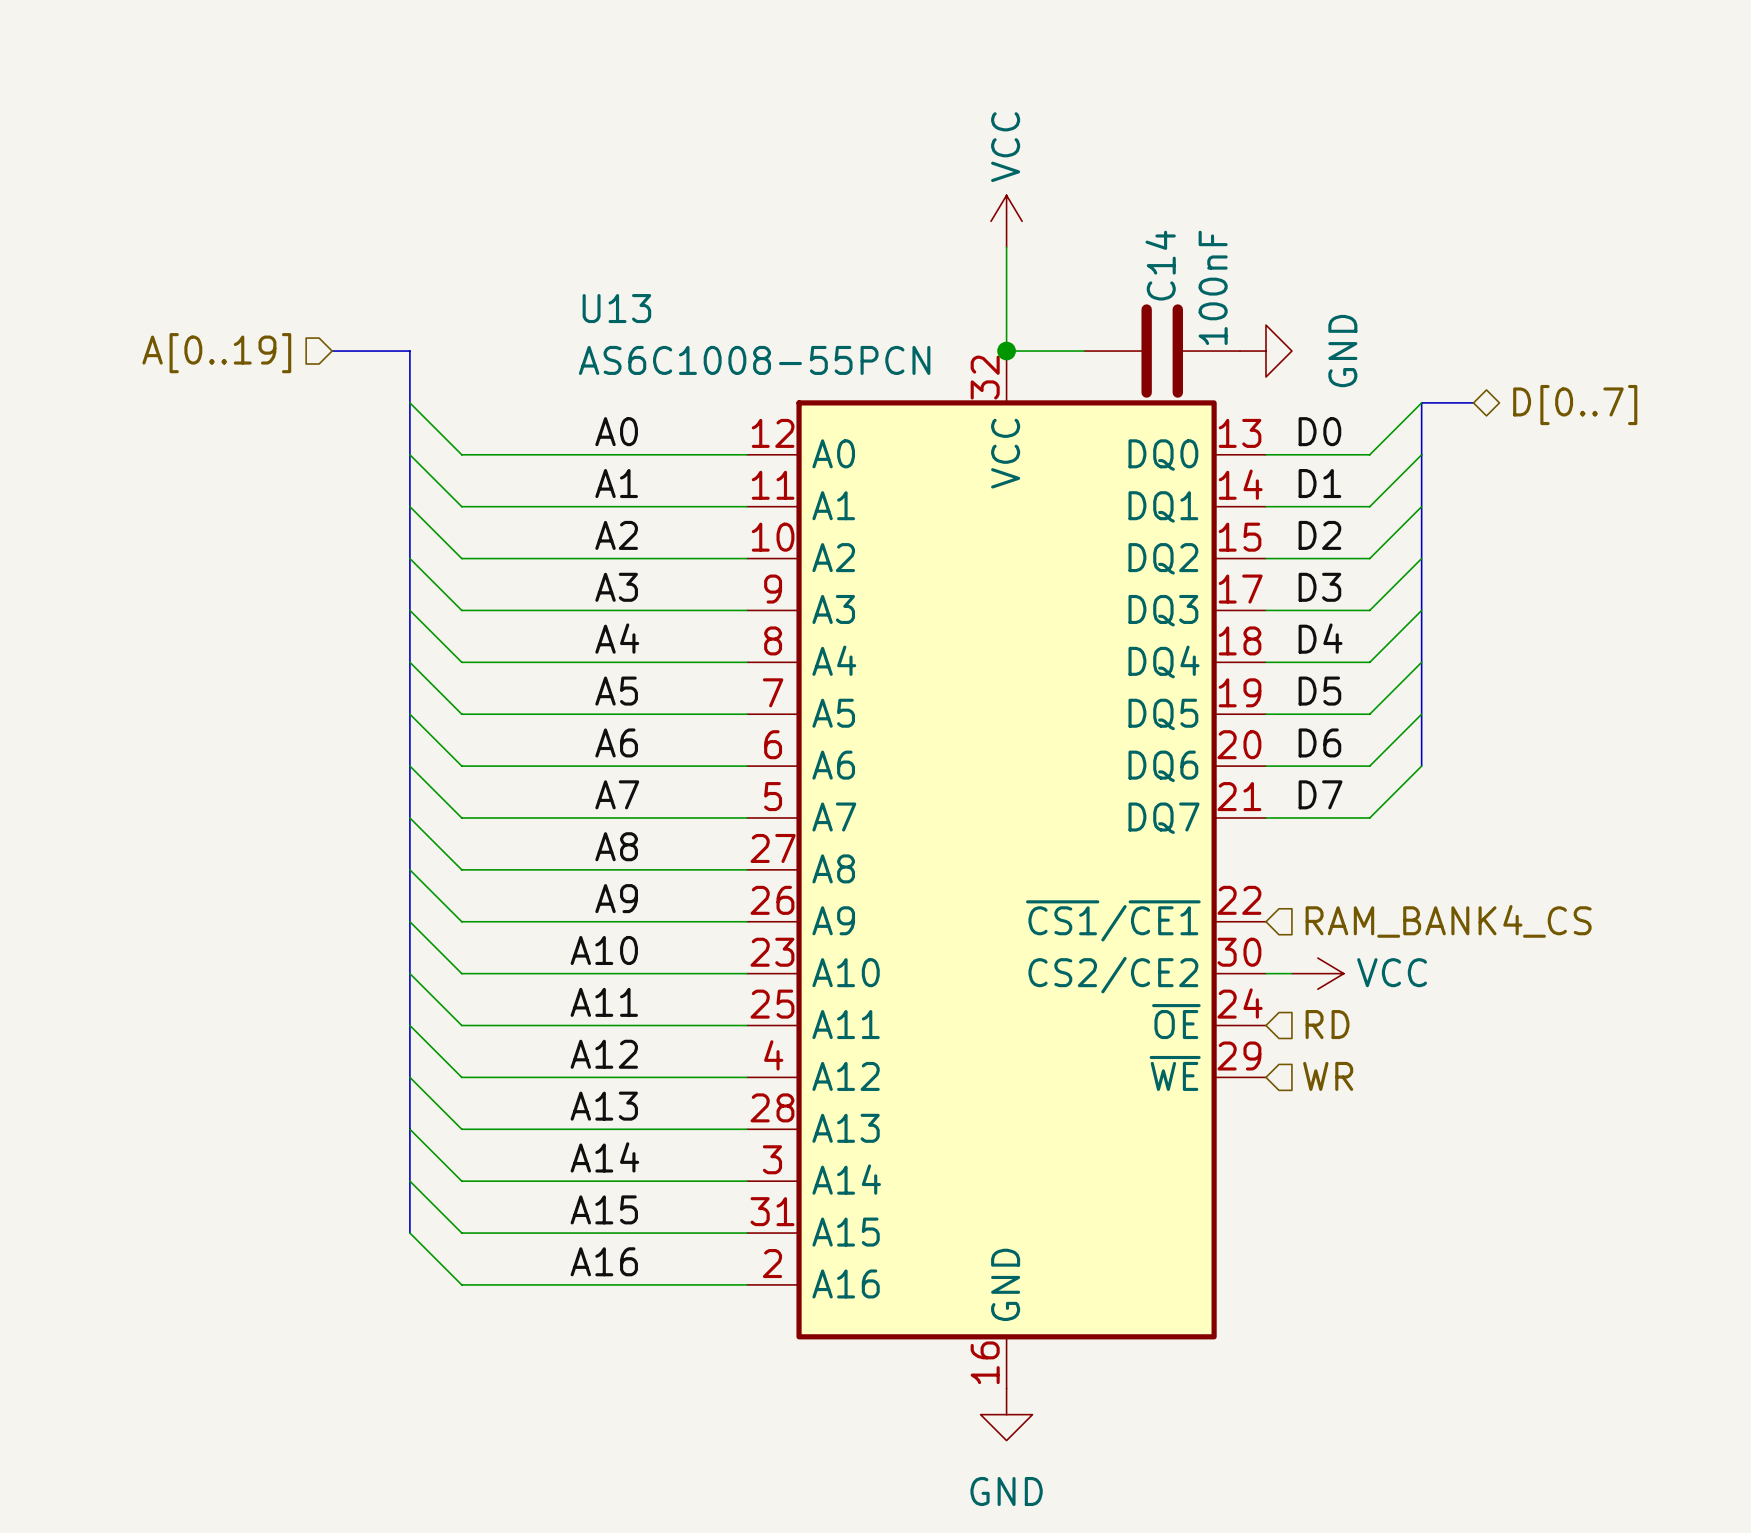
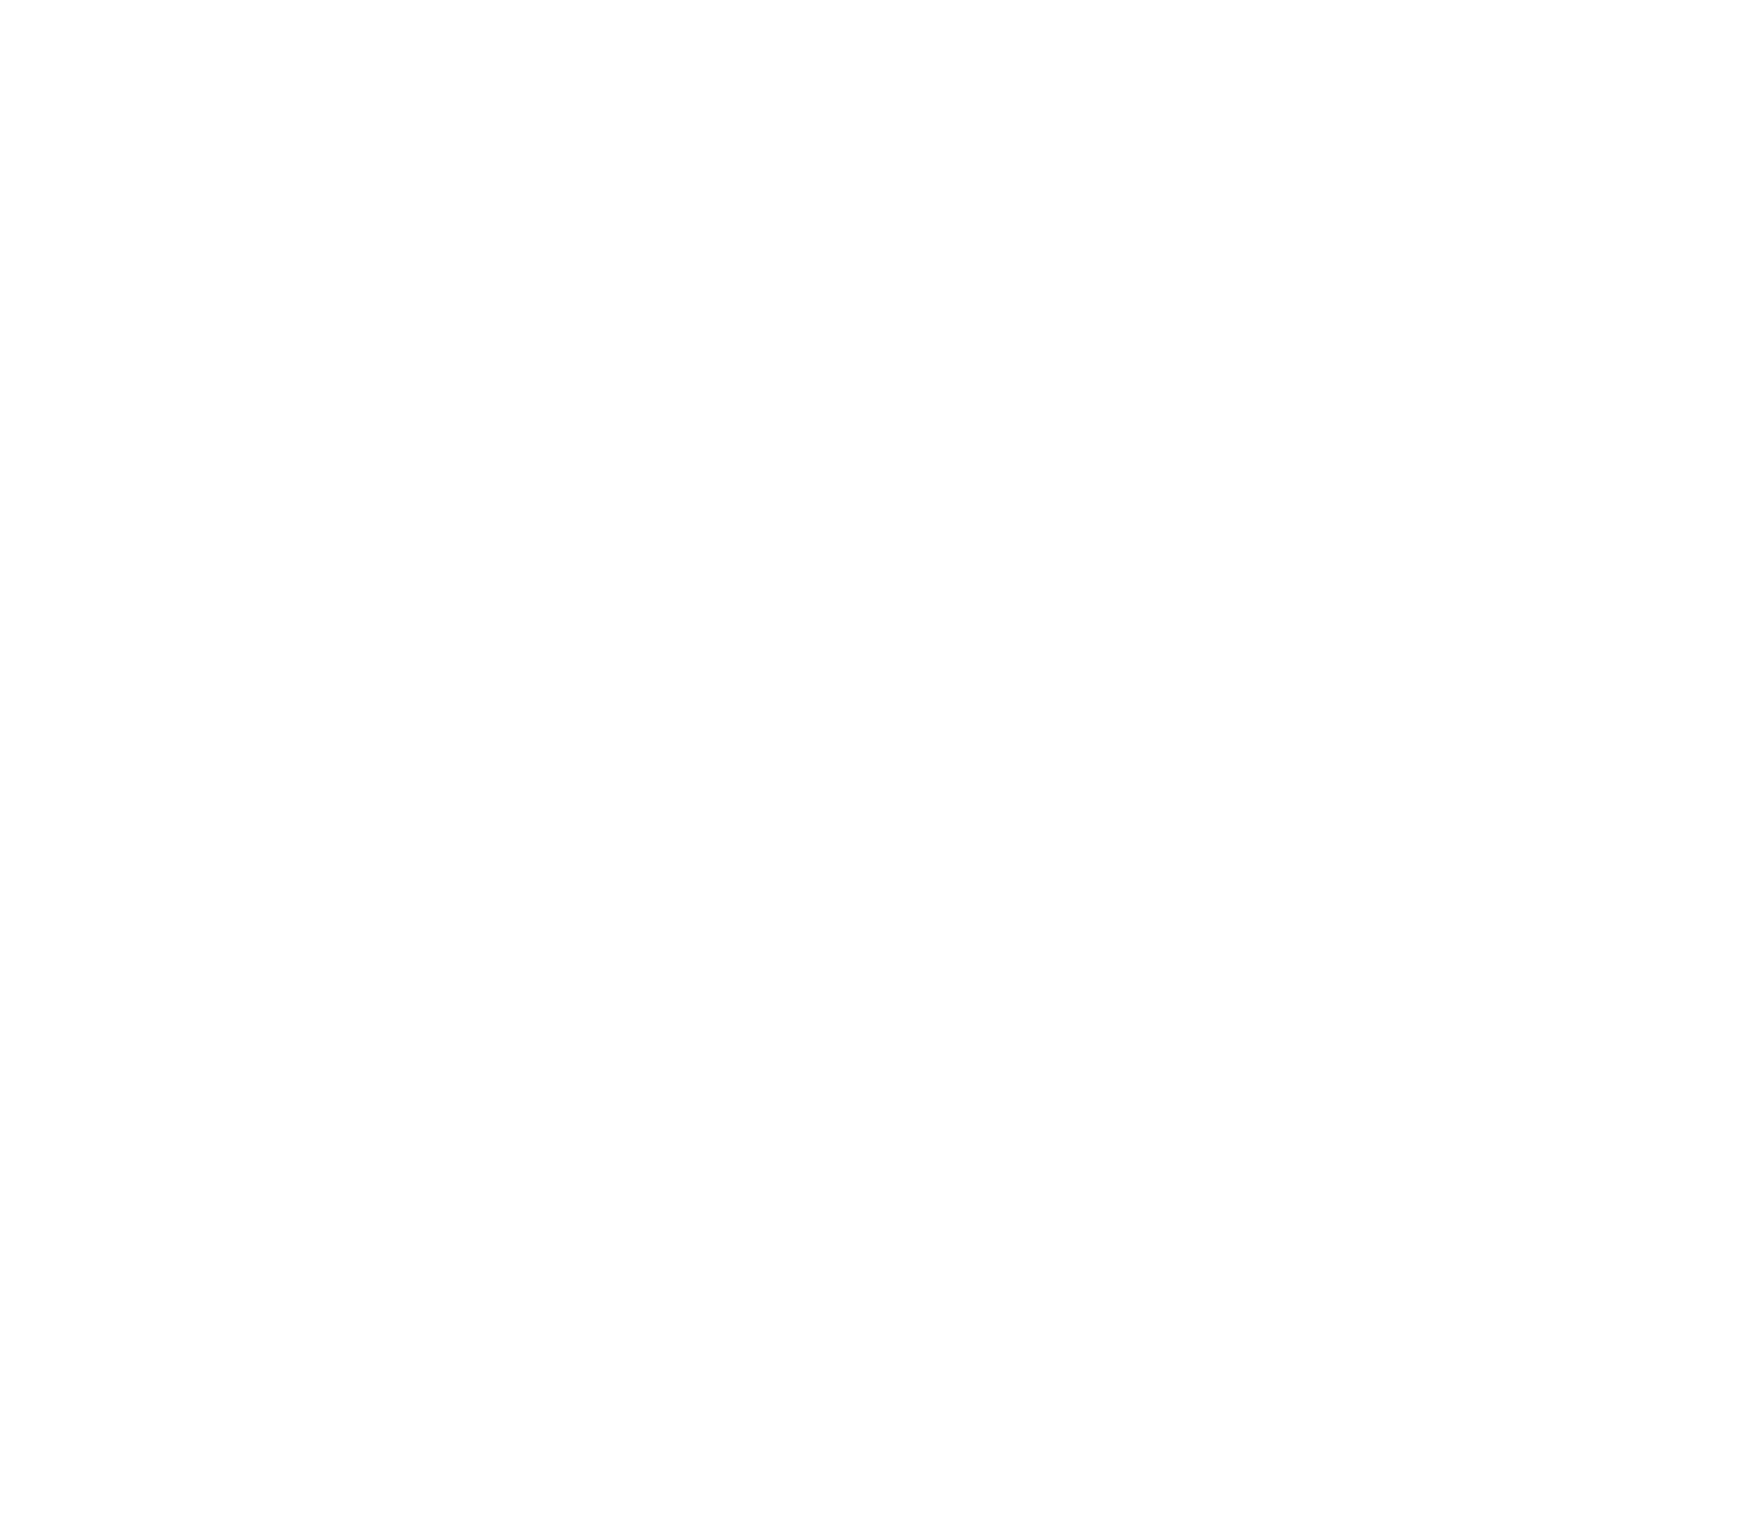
power symbol: VCC (1006, 221) -> none
wire: (1006, 247) (1006, 351) (1084, 351) -> none
bus: (332, 351) (409, 351) (409, 1233) -> none
junction: (1006, 351) -> none
C14: 100nF (1162, 351) -> none
power symbol: GND (1265, 351) -> none
hierarchical label: A[0..19] (216, 353) -> none
wire: (409, 402) (461, 454) (747, 454) -> none
wire: (1421, 402) (1369, 454) (1265, 454) -> none
bus: (1473, 402) (1421, 402) (1421, 766) -> none
hierarchical label: D[0..7] (1575, 405) -> none
label: A0 (616, 431) -> none
label: D0 (1319, 431) -> none
wire: (409, 454) (461, 506) (747, 506) -> none
wire: (1421, 454) (1369, 506) (1265, 506) -> none
label: A1 (616, 483) -> none
label: D1 (1319, 483) -> none
wire: (409, 506) (461, 558) (747, 558) -> none
wire: (1421, 506) (1369, 558) (1265, 558) -> none
label: A2 (616, 535) -> none
label: D2 (1319, 535) -> none
wire: (409, 558) (461, 610) (747, 610) -> none
wire: (1421, 558) (1369, 610) (1265, 610) -> none
label: A3 (616, 587) -> none
label: D3 (1319, 587) -> none
wire: (409, 610) (461, 662) (747, 662) -> none
wire: (1421, 610) (1369, 662) (1265, 662) -> none
label: A4 (617, 638) -> none
label: D4 (1320, 638) -> none
wire: (409, 662) (461, 714) (747, 714) -> none
wire: (1421, 662) (1369, 714) (1265, 714) -> none
label: A5 (616, 691) -> none
label: D5 (1319, 691) -> none
wire: (409, 714) (461, 766) (747, 766) -> none
wire: (1421, 714) (1369, 766) (1265, 766) -> none
label: A6 (616, 742) -> none
label: D6 (1319, 742) -> none
wire: (409, 766) (461, 817) (747, 817) -> none
wire: (1421, 766) (1369, 817) (1265, 817) -> none
label: A7 (617, 794) -> none
label: D7 (1320, 794) -> none
wire: (409, 817) (461, 869) (747, 869) -> none
label: A8 (616, 846) -> none
wire: (409, 869) (461, 921) (747, 921) -> none
U13: AS6C1008-55PCN (1006, 869) -> none
label: A9 (616, 898) -> none
wire: (409, 921) (461, 973) (747, 973) -> none
hierarchical label: RAM_BANK4_CS (1448, 921) -> none
label: A10 (604, 950) -> none
wire: (409, 973) (461, 1025) (747, 1025) -> none
wire: (1265, 973) (1291, 973) -> none
power symbol: VCC (1317, 973) -> none
label: A11 (604, 1002) -> none
hierarchical label: RD (1327, 1024) -> none
wire: (409, 1025) (461, 1077) (747, 1077) -> none
label: A12 (604, 1054) -> none
hierarchical label: WR (1328, 1076) -> none
wire: (409, 1077) (461, 1129) (747, 1129) -> none
label: A13 (604, 1106) -> none
wire: (409, 1129) (461, 1181) (747, 1181) -> none
label: A14 (604, 1157) -> none
wire: (409, 1181) (461, 1233) (747, 1233) -> none
label: A15 (604, 1209) -> none
wire: (409, 1233) (461, 1284) (747, 1284) -> none
label: A16 (604, 1261) -> none
power symbol: GND (1006, 1414) -> none

